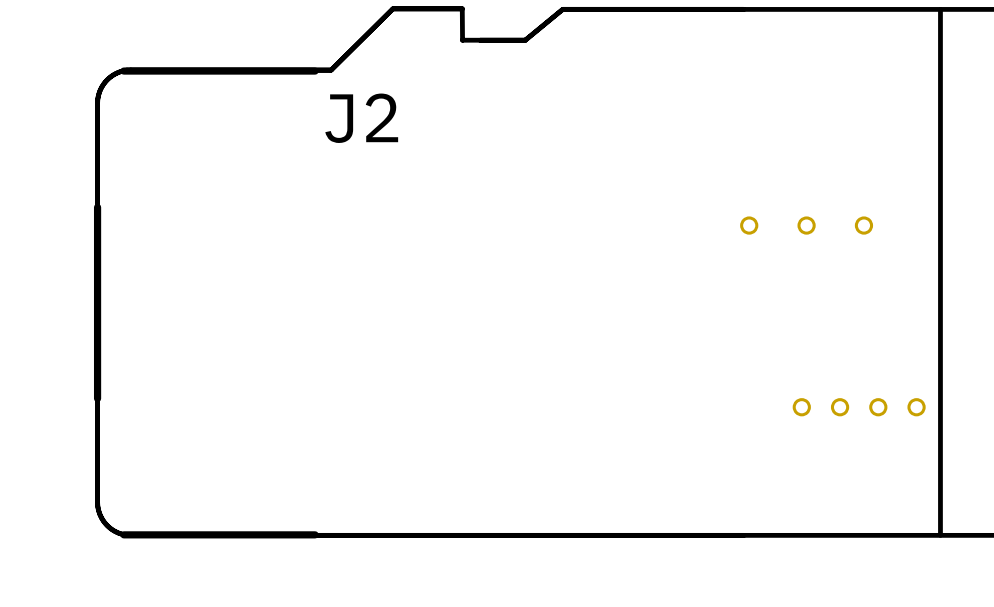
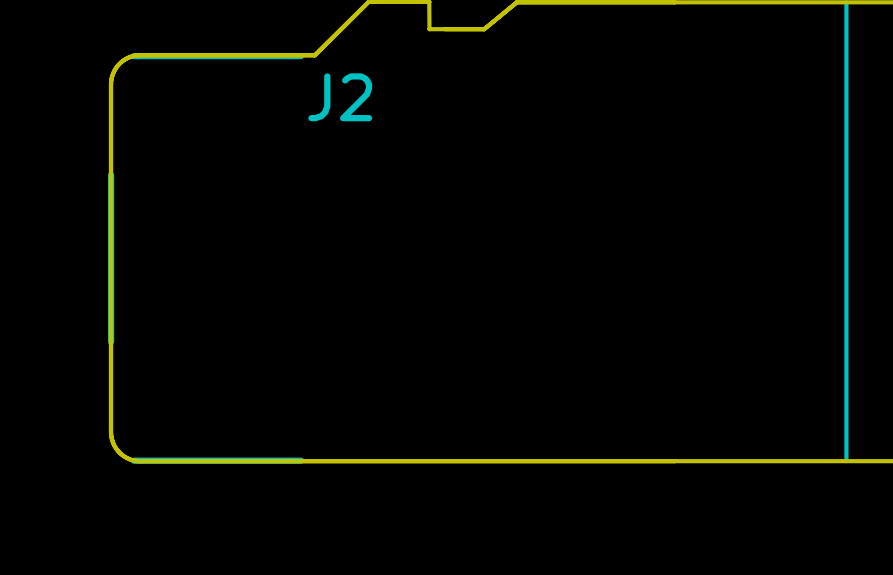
part: (749, 225) -> none
part: (806, 225) -> none
part: (863, 225) -> none
part: (801, 407) -> none
part: (840, 407) -> none
part: (878, 407) -> none
part: (916, 407) -> none

